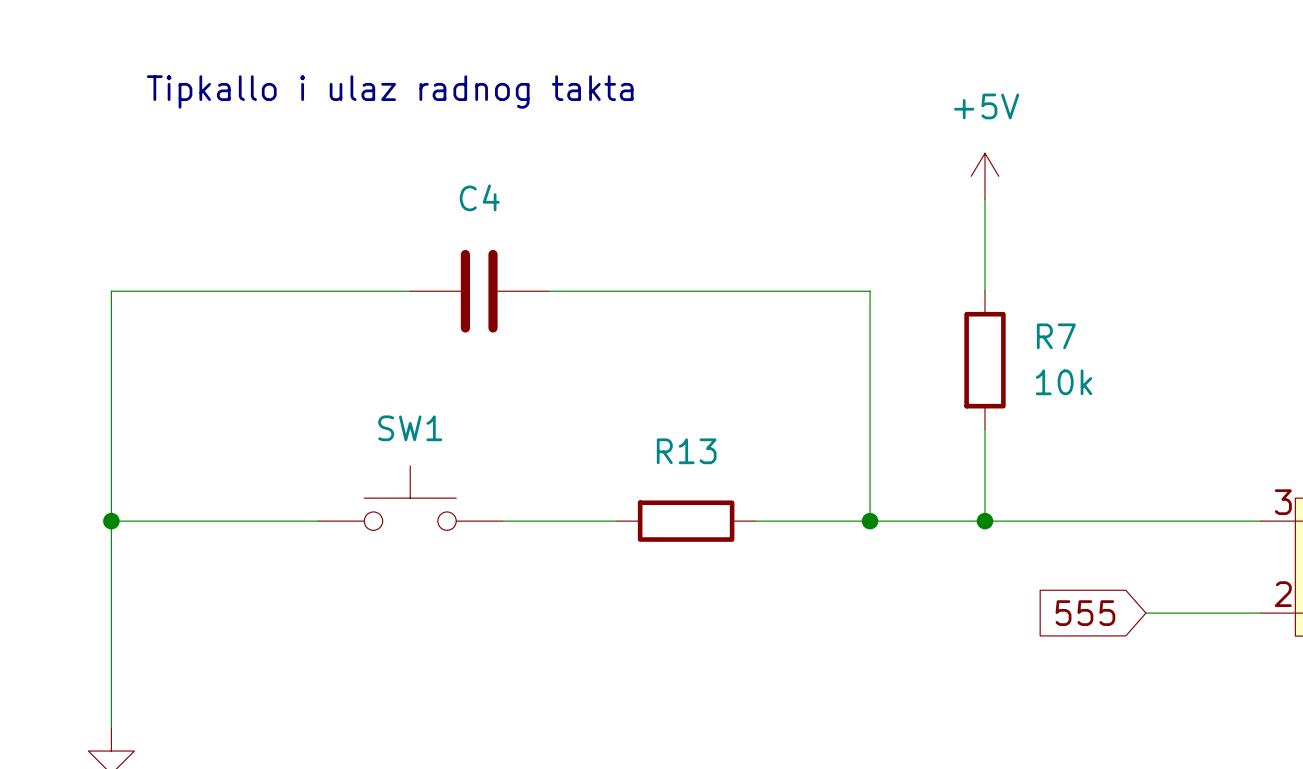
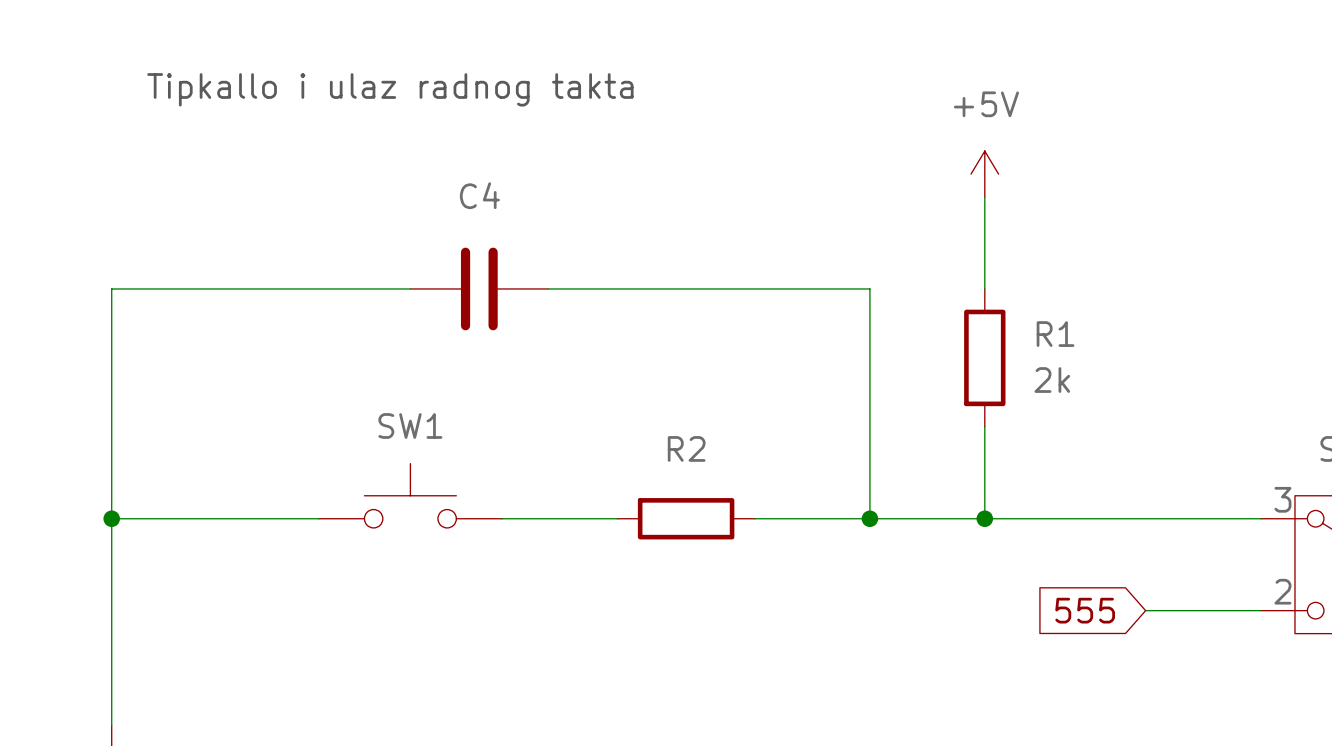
R7 name: R7 (1056, 336) -> R1 (1055, 334)
R7 value: 10k (1063, 382) -> 2k (1052, 380)
R13 name: R13 (686, 451) -> R2 (686, 448)

